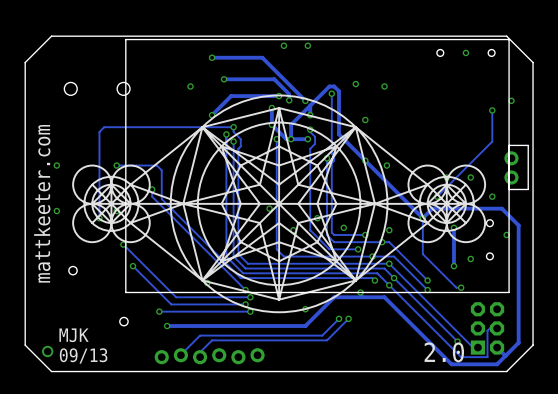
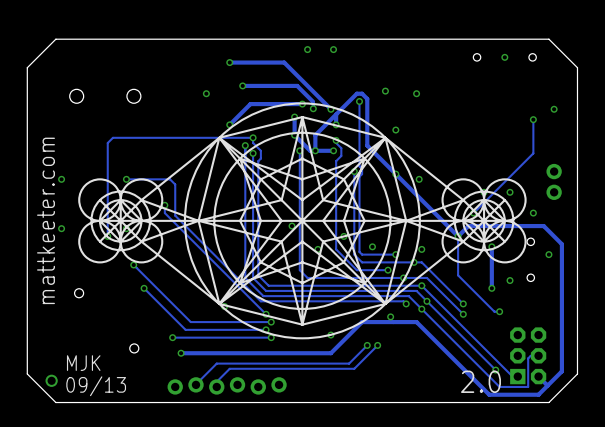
board edge: (509, 39) (125, 39) (125, 292) (509, 292) (509, 39) -> none
board edge: (509, 145) (528, 145) (528, 189) (509, 189) -> none

